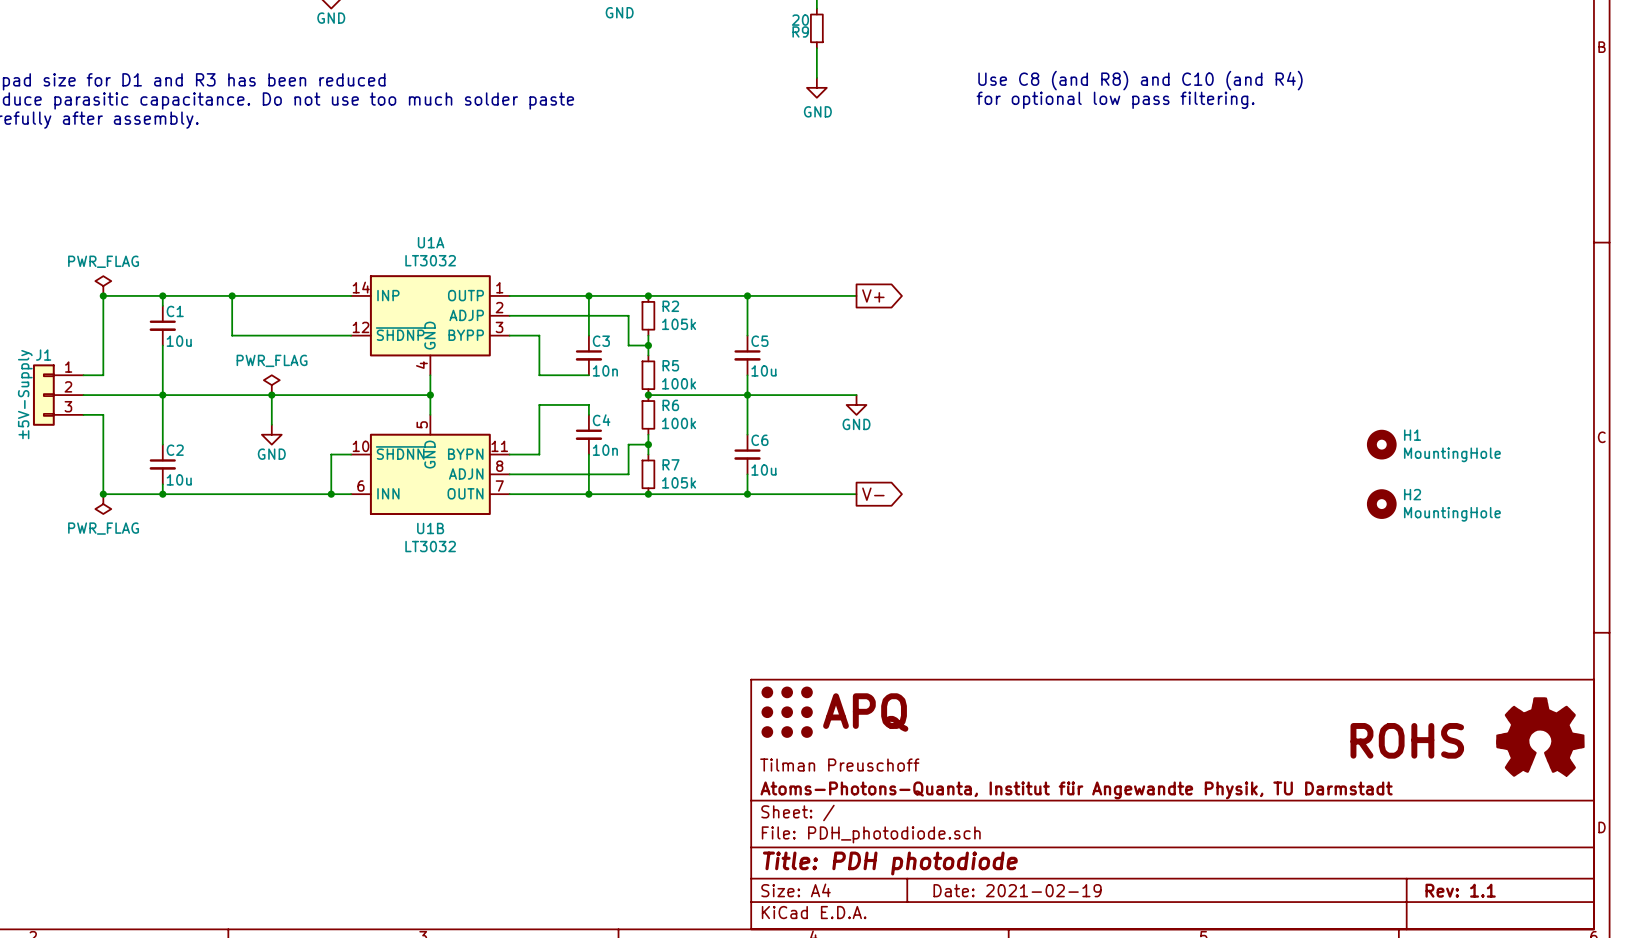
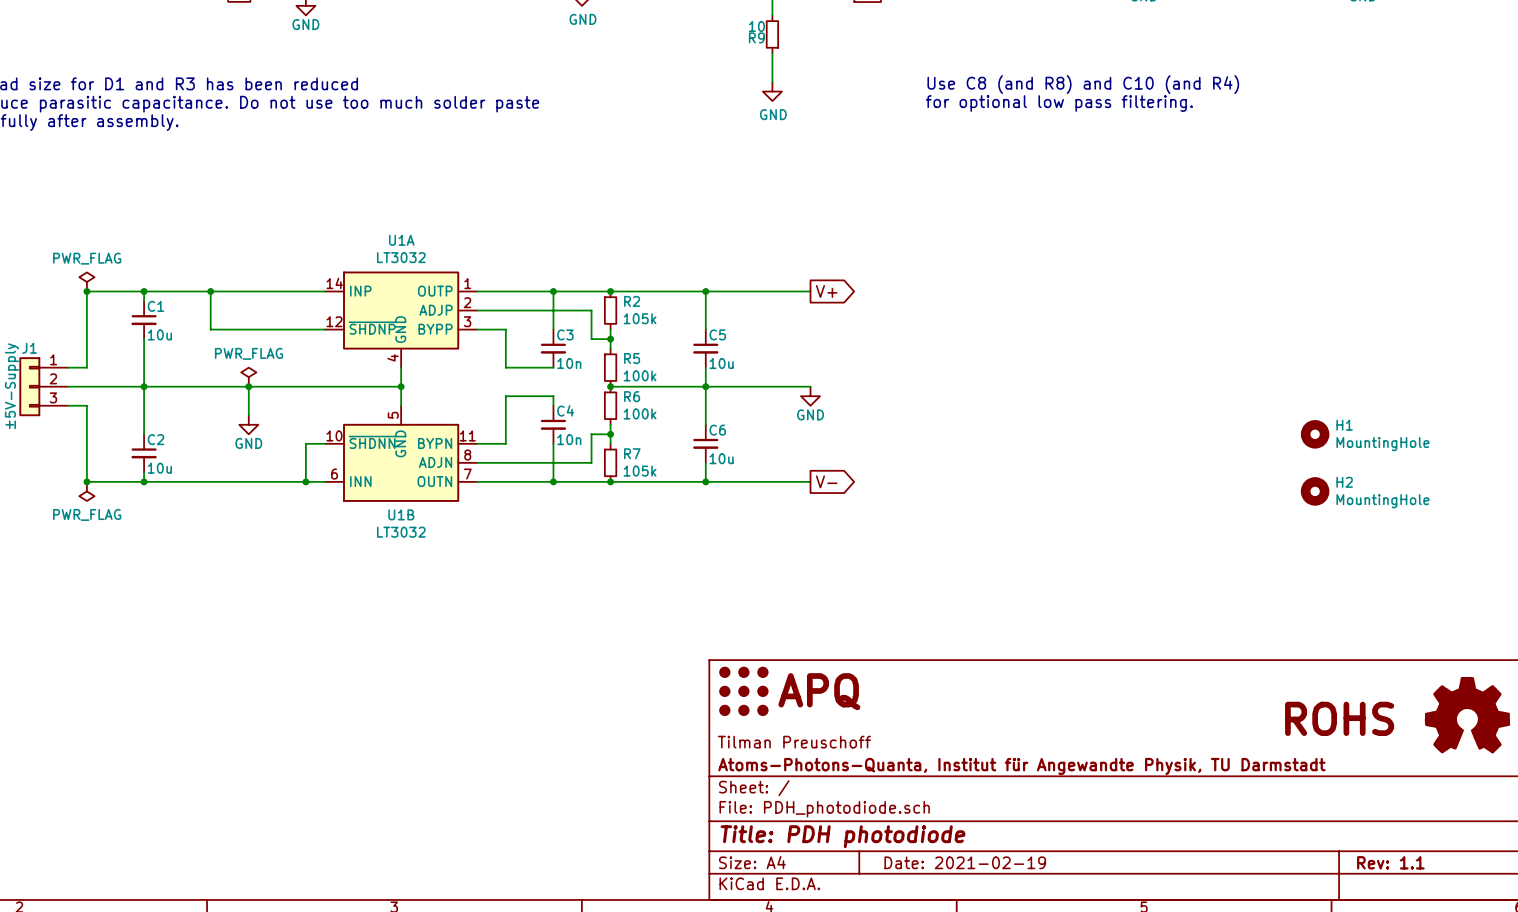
R9 value: 20 (800, 20) -> 10 (756, 26)

